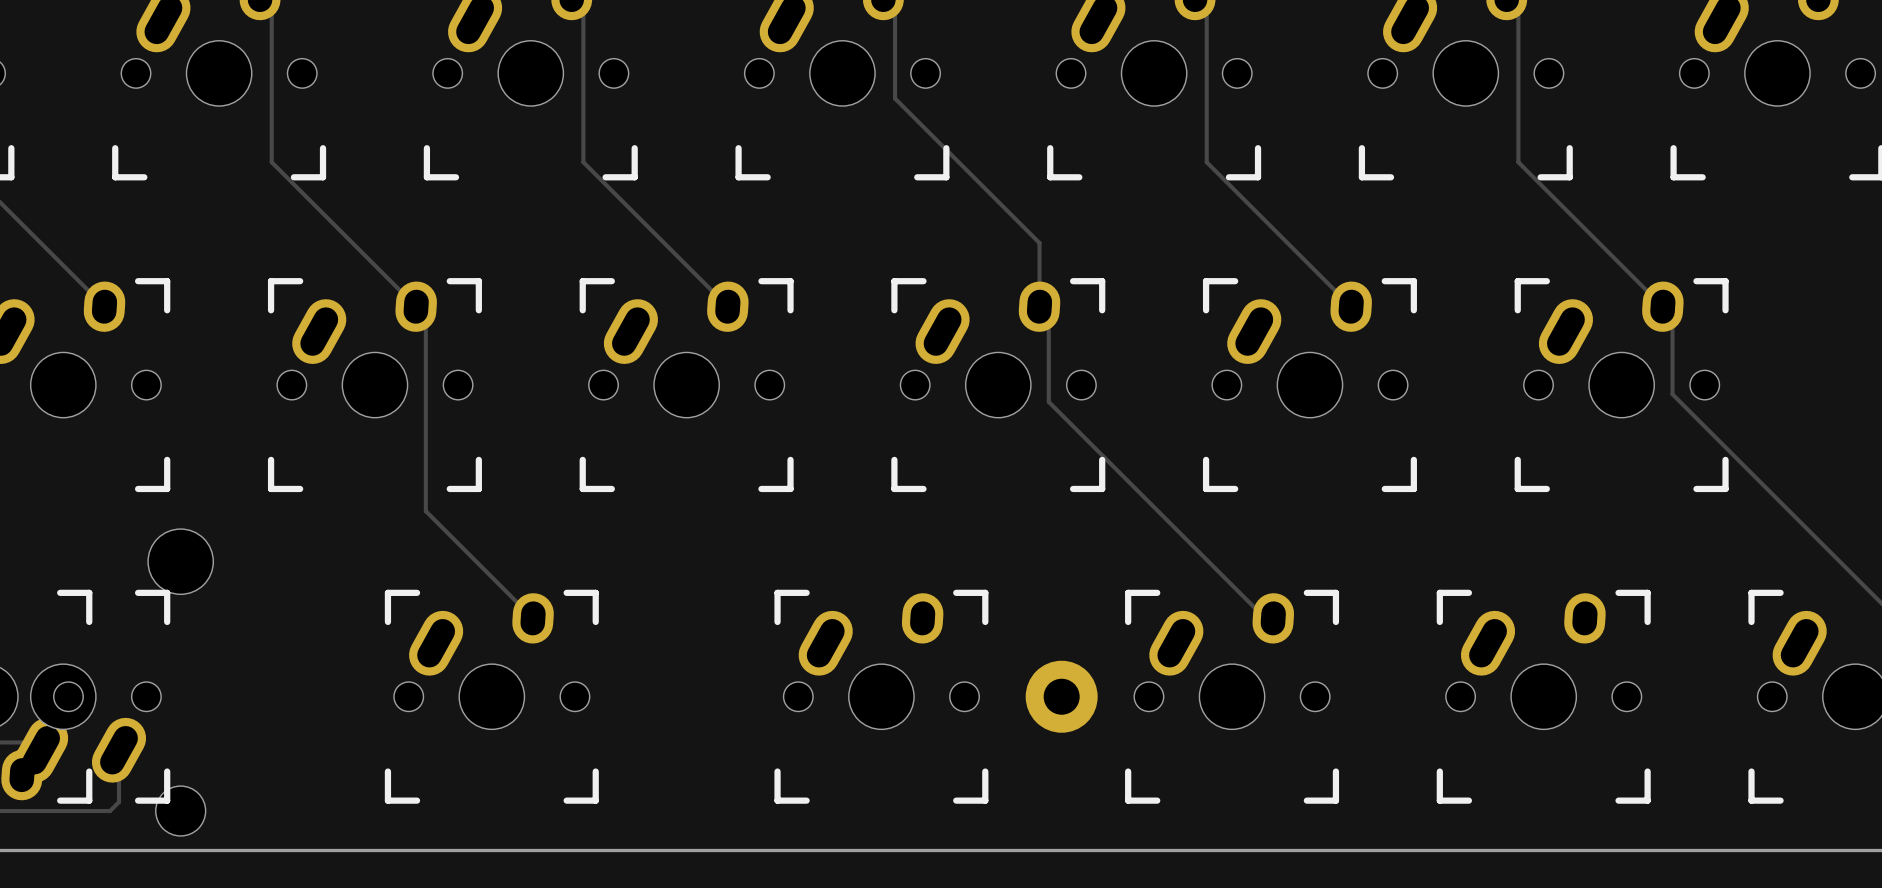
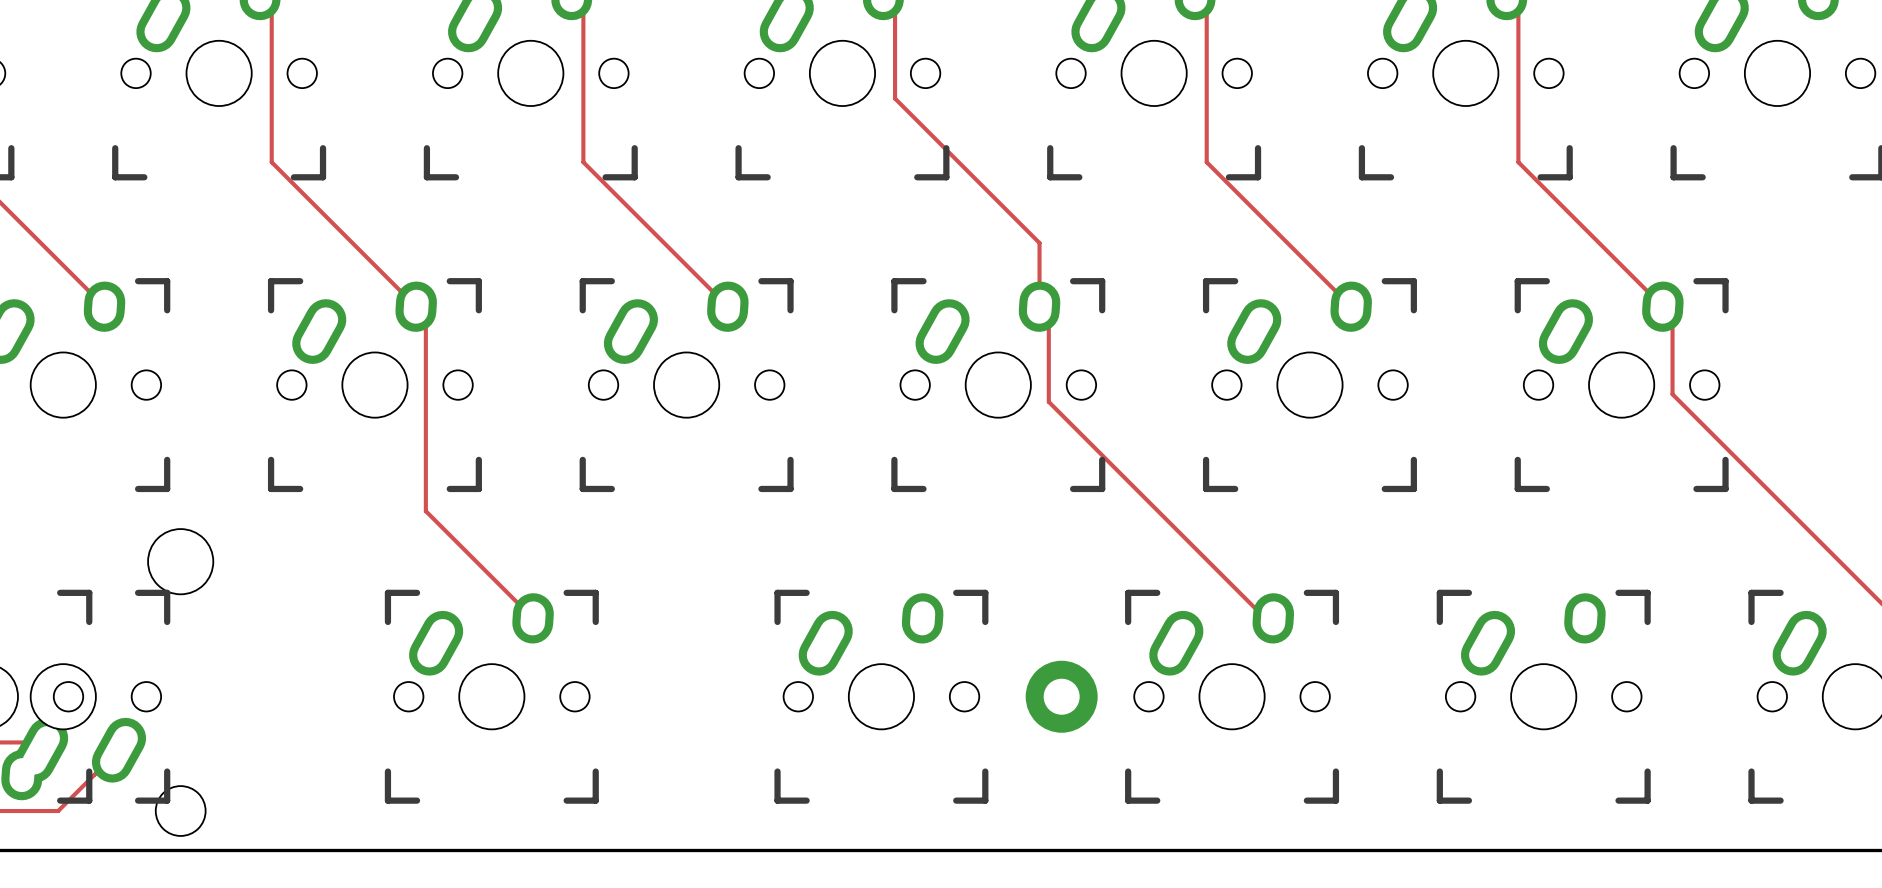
track: (119, 750) (119, 802) (110, 811) (58, 811) -> (119, 750) (58, 811)

